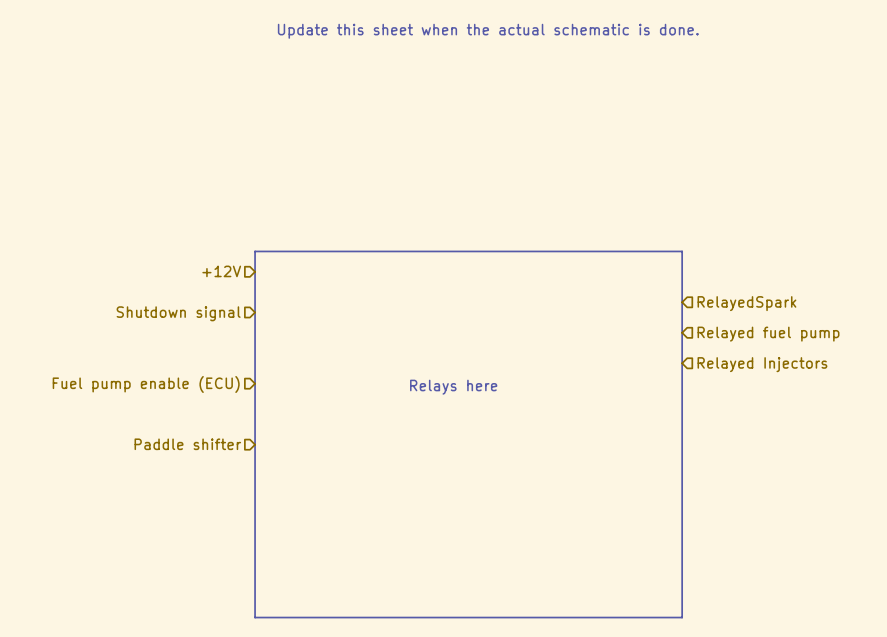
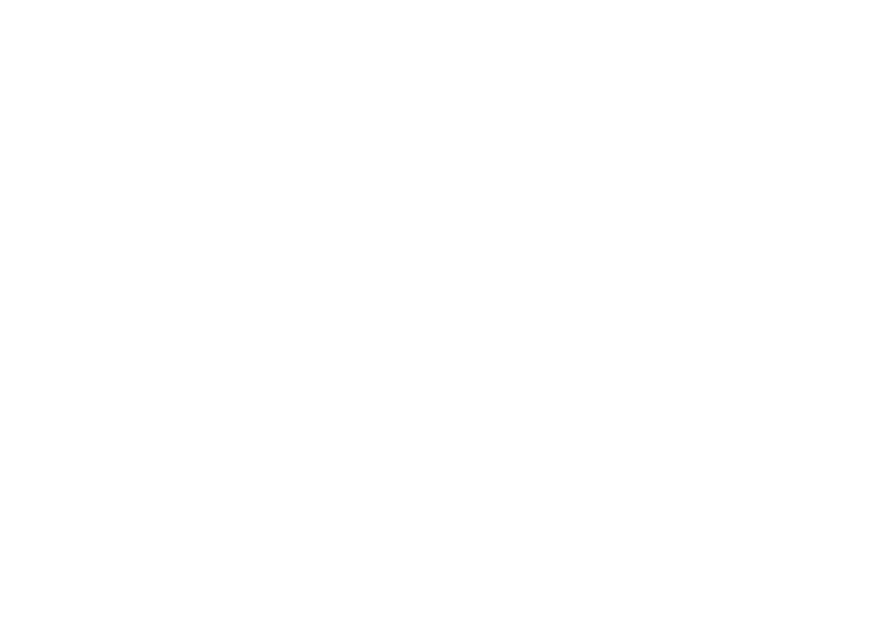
text: Update this sheet when the actual schematic is done. (488, 31) -> none
line: (255, 251) (255, 617) (682, 617) (682, 251) (255, 251) -> none
hierarchical label: +12V (221, 271) -> none
hierarchical label: RelayedSpark (746, 303) -> none
hierarchical label: Shutdown signal (178, 313) -> none
hierarchical label: Relayed fuel pump (768, 334) -> none
hierarchical label: Relayed Injectors (762, 364) -> none
hierarchical label: Fuel pump enable (ECU) (146, 384) -> none
text: Relays here (453, 387) -> none
hierarchical label: Paddle shifter (187, 444) -> none

